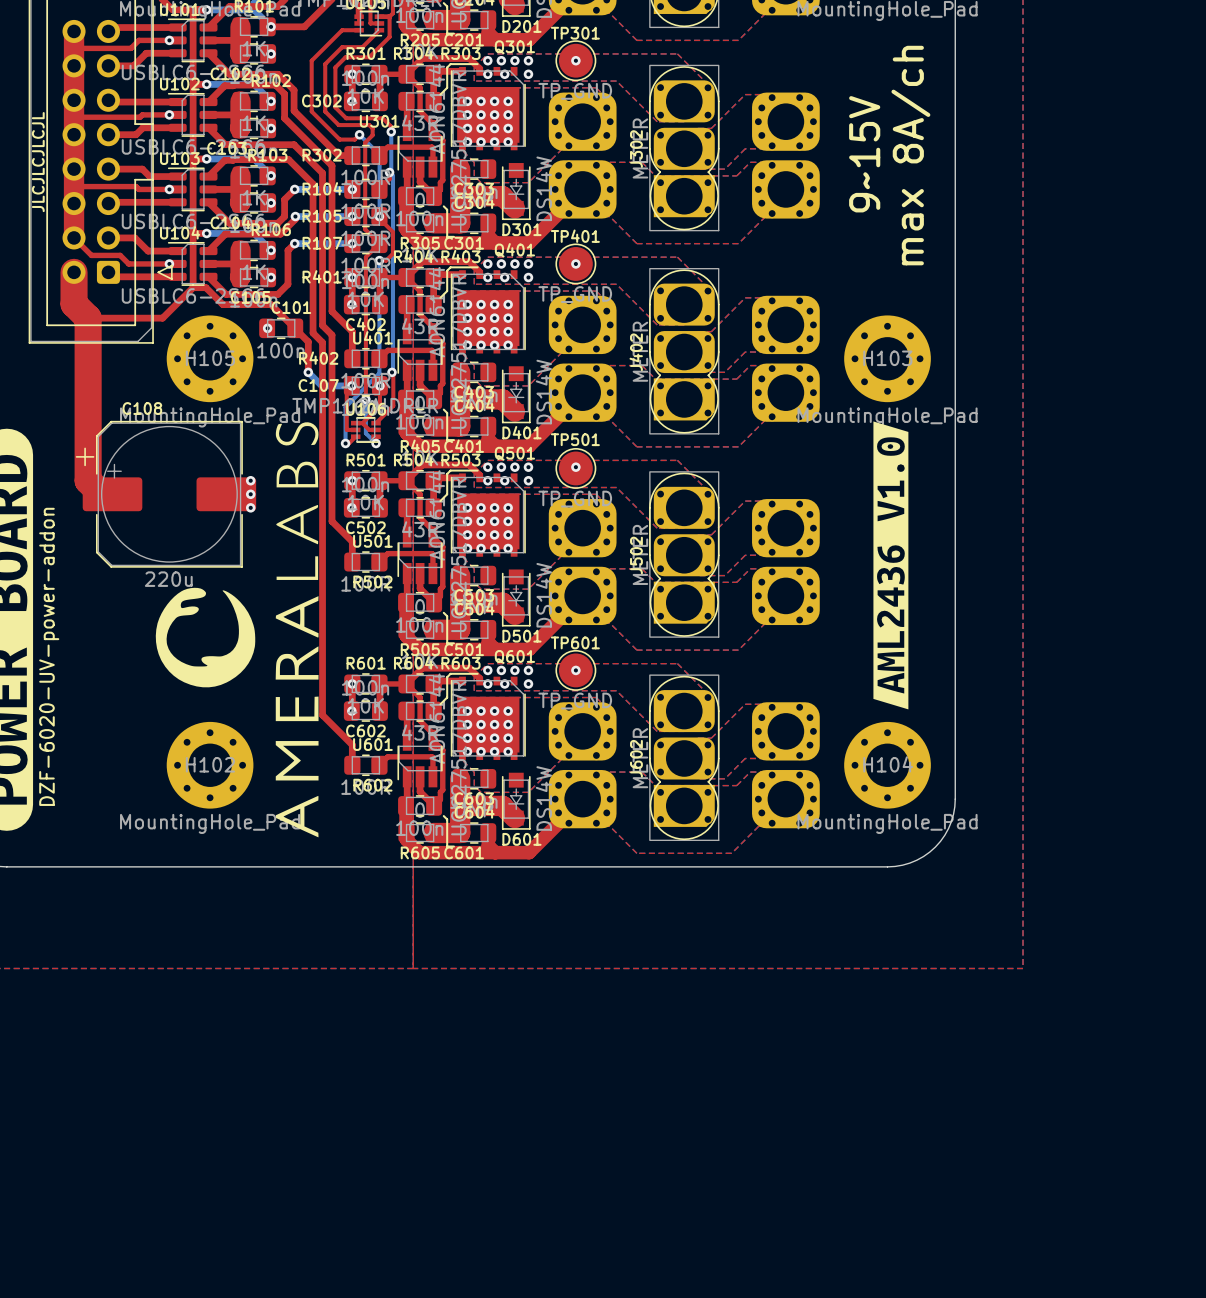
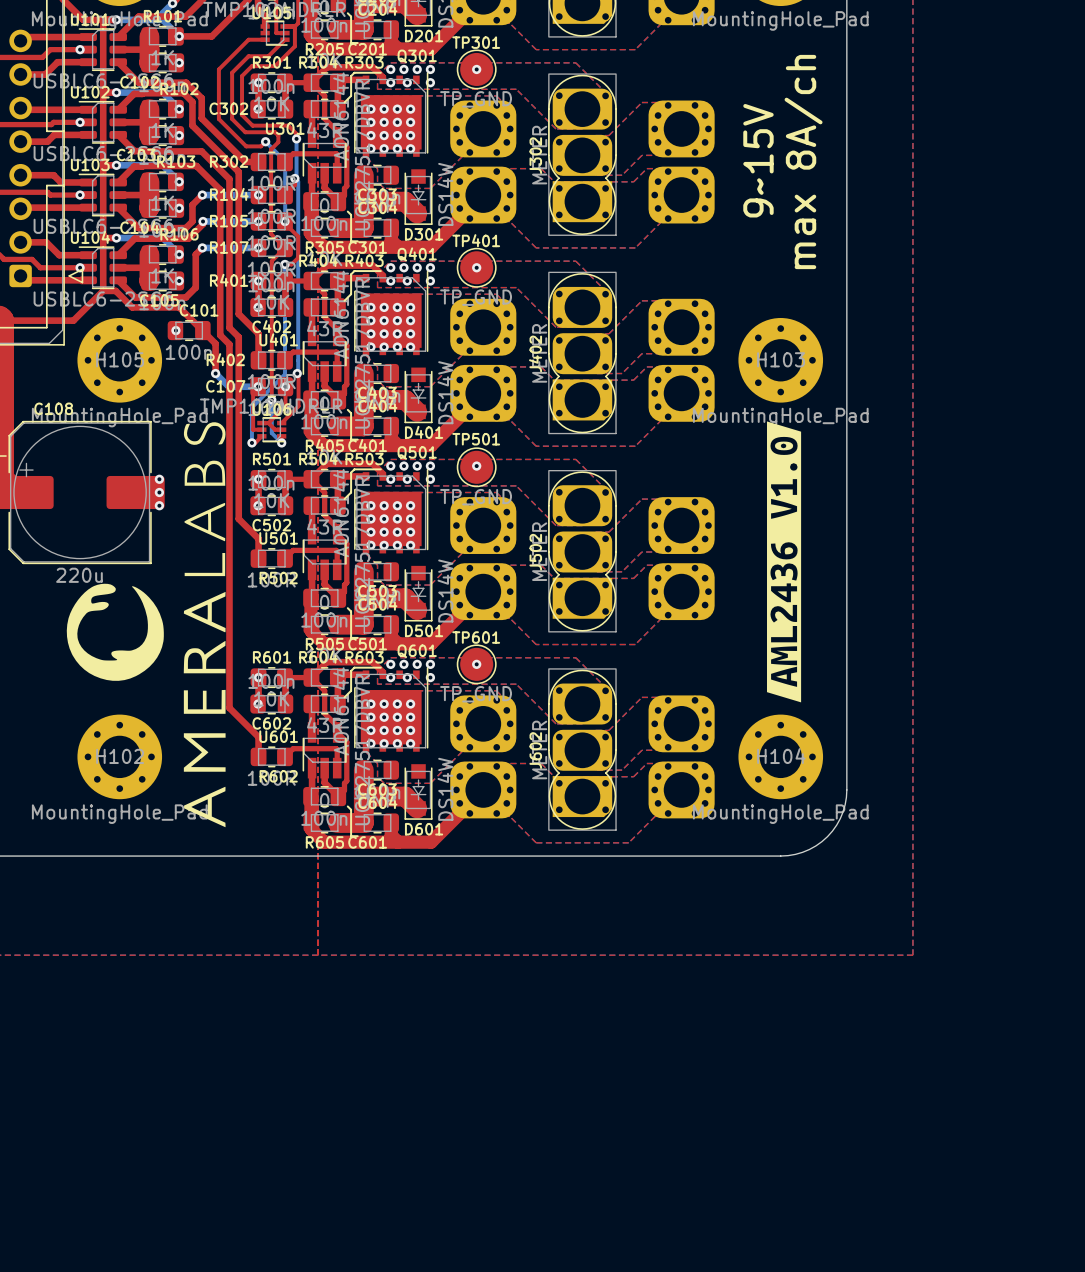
Q301 footprint: [450, 66, 526, 151] -> [354, 72, 429, 157]
Q401 footprint: [450, 270, 526, 354] -> [354, 270, 429, 356]
Q501 footprint: [450, 473, 526, 557] -> [354, 469, 429, 554]
Q601 footprint: [450, 676, 526, 760] -> [354, 667, 429, 752]

